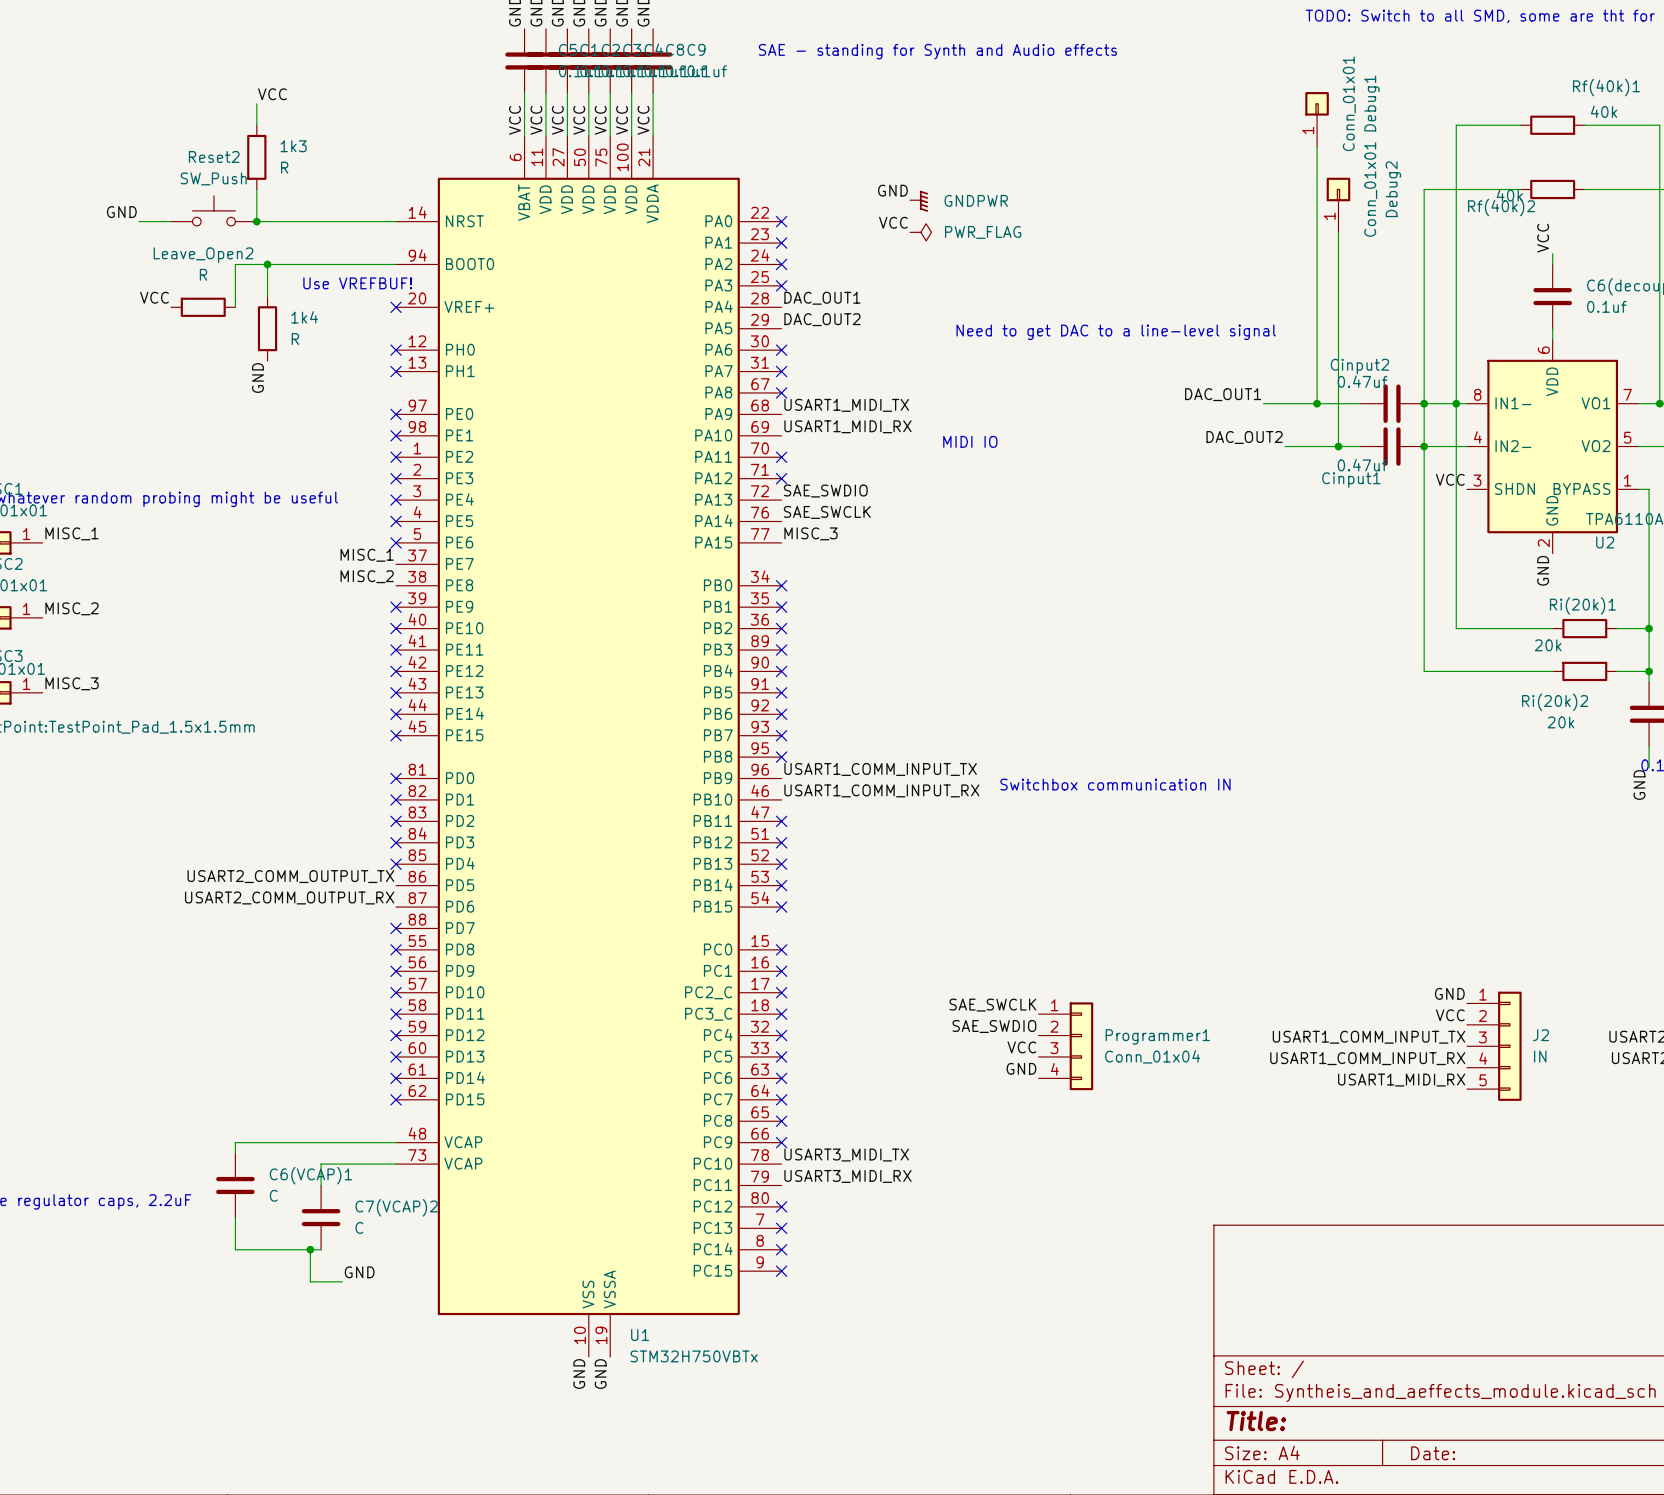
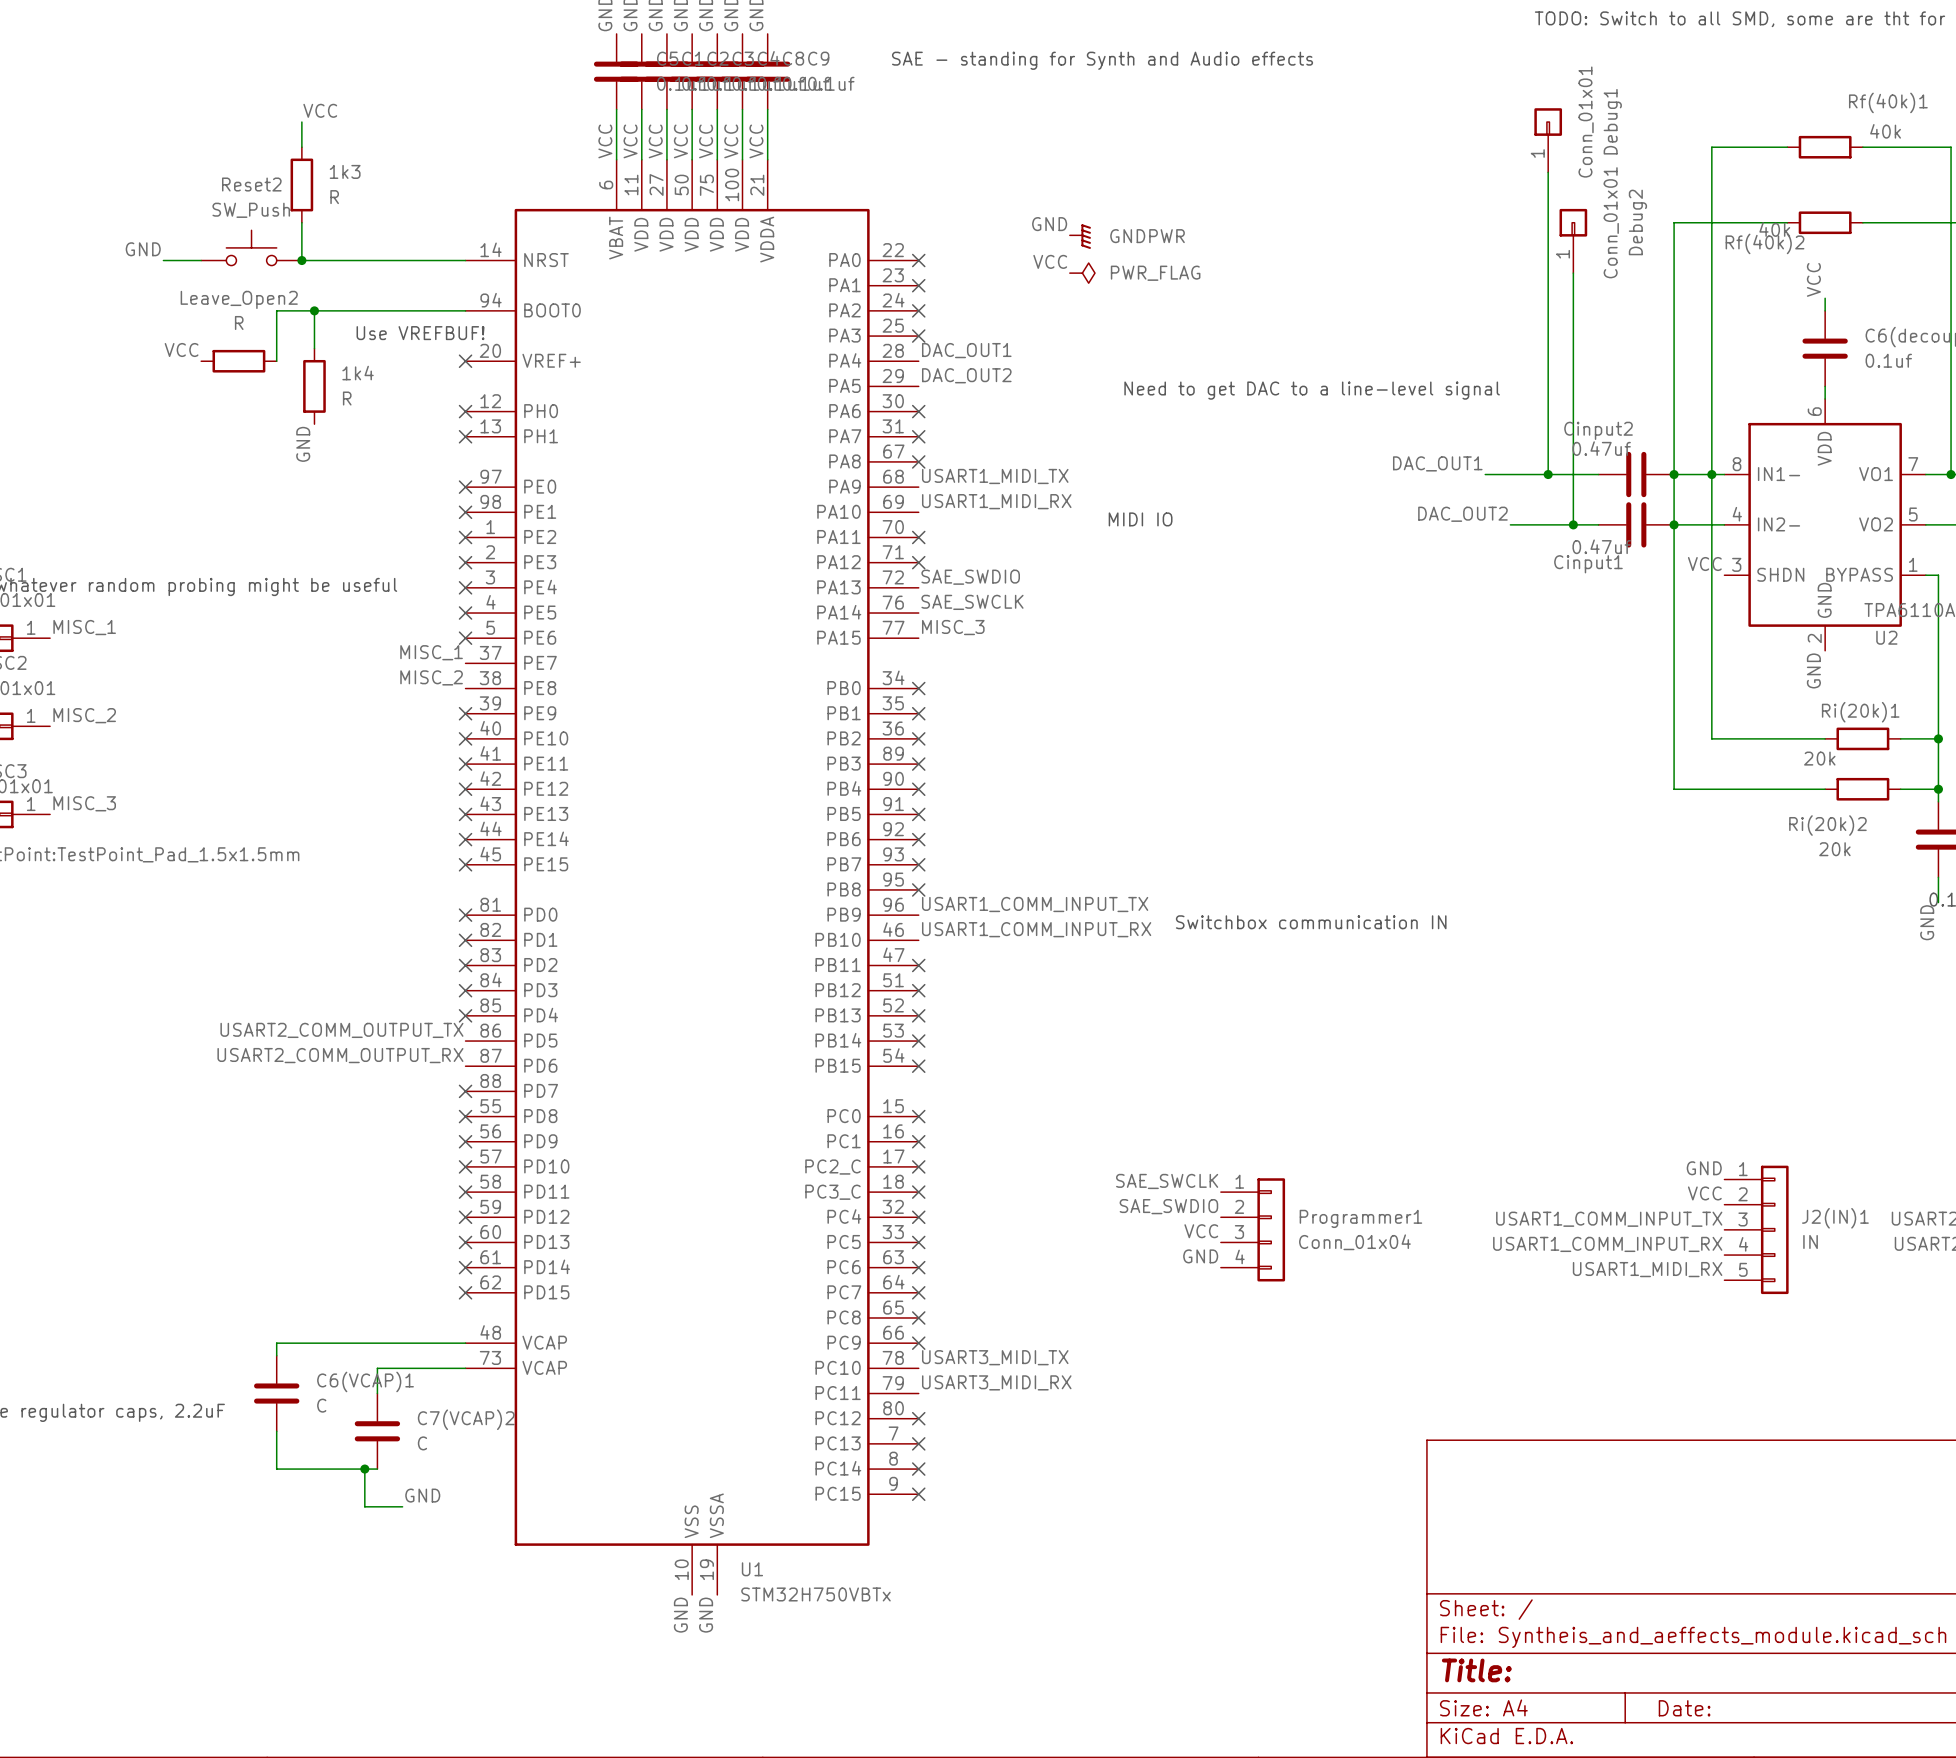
J2 name: J2 (1541, 1035) -> J2(IN)1 (1835, 1218)

